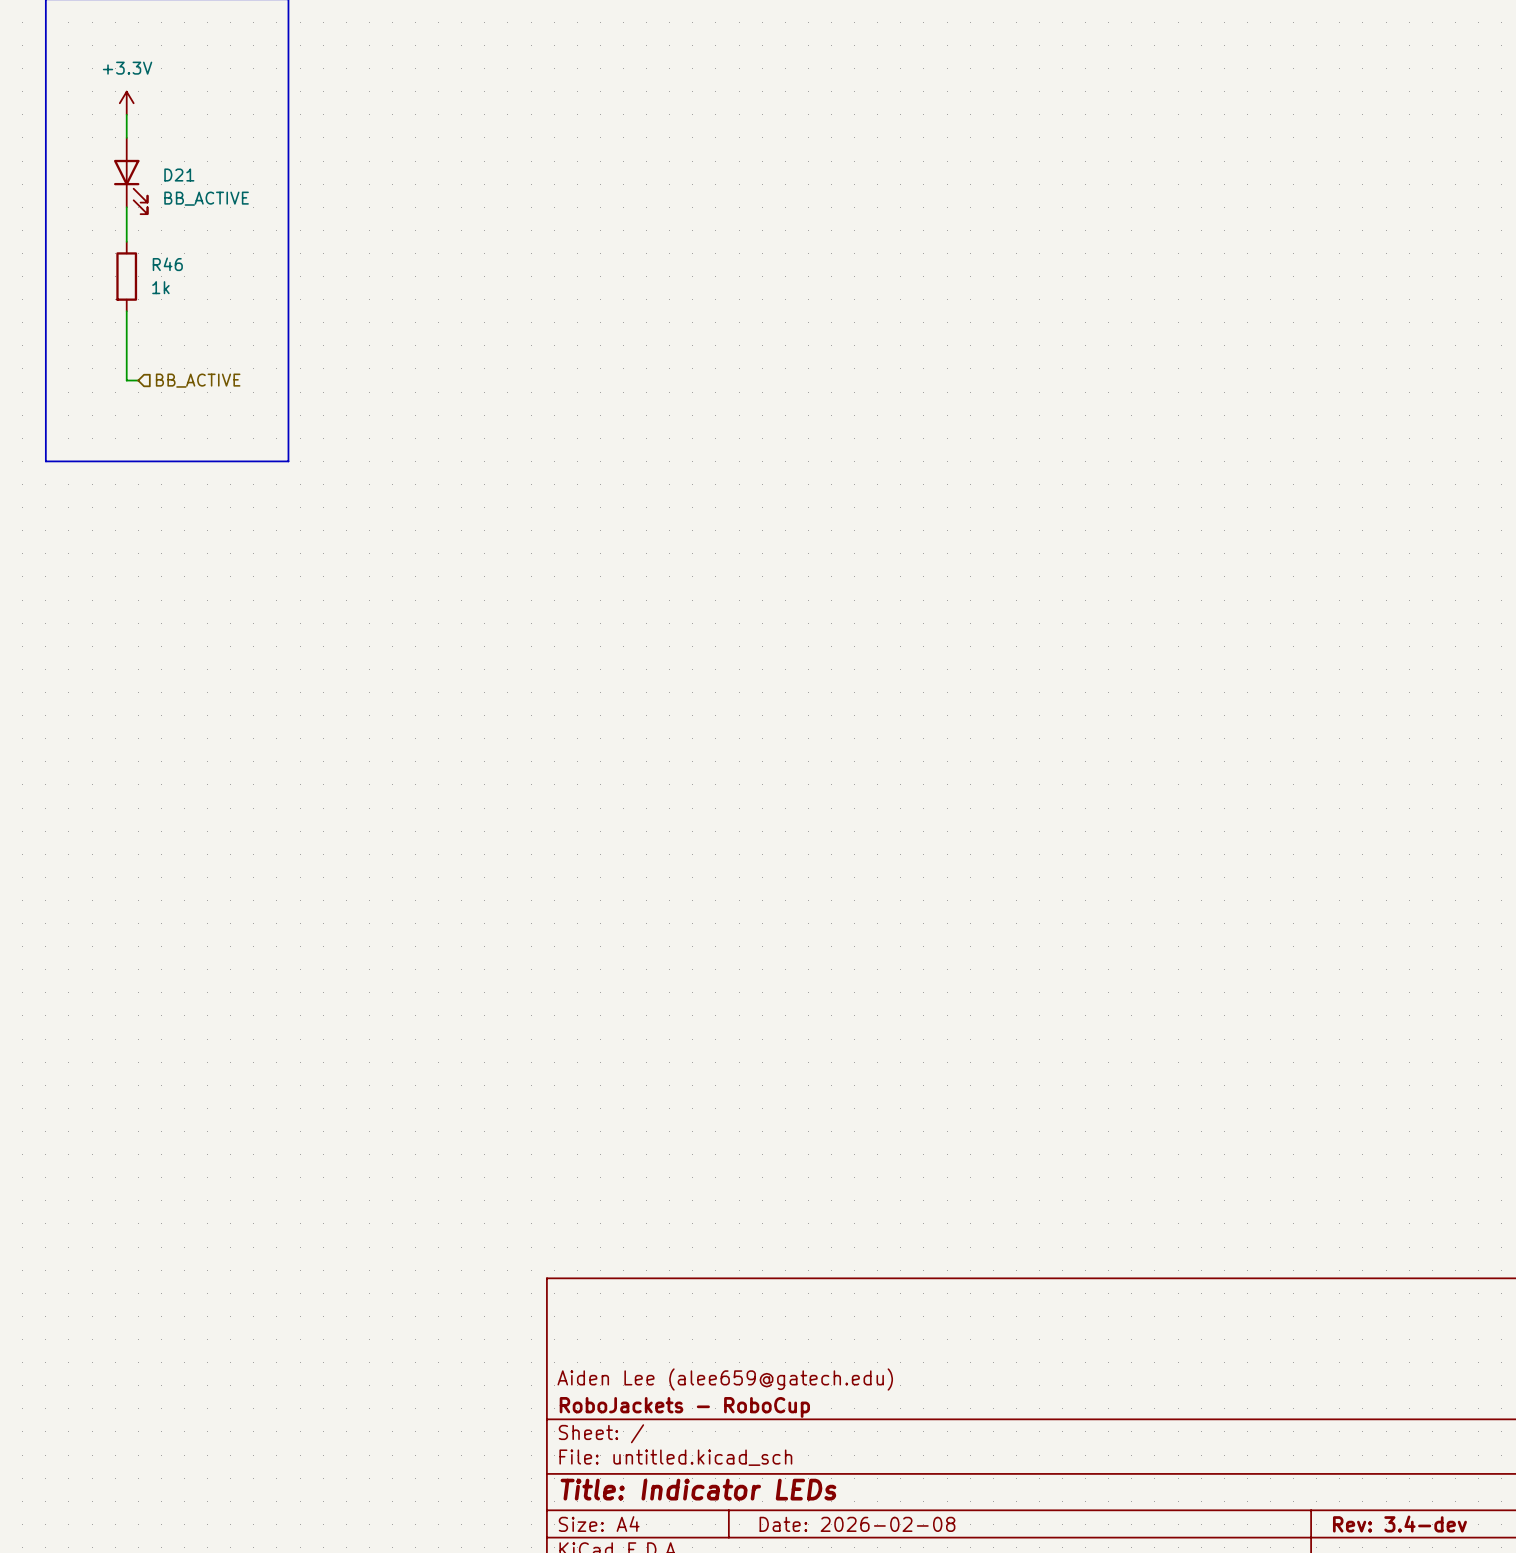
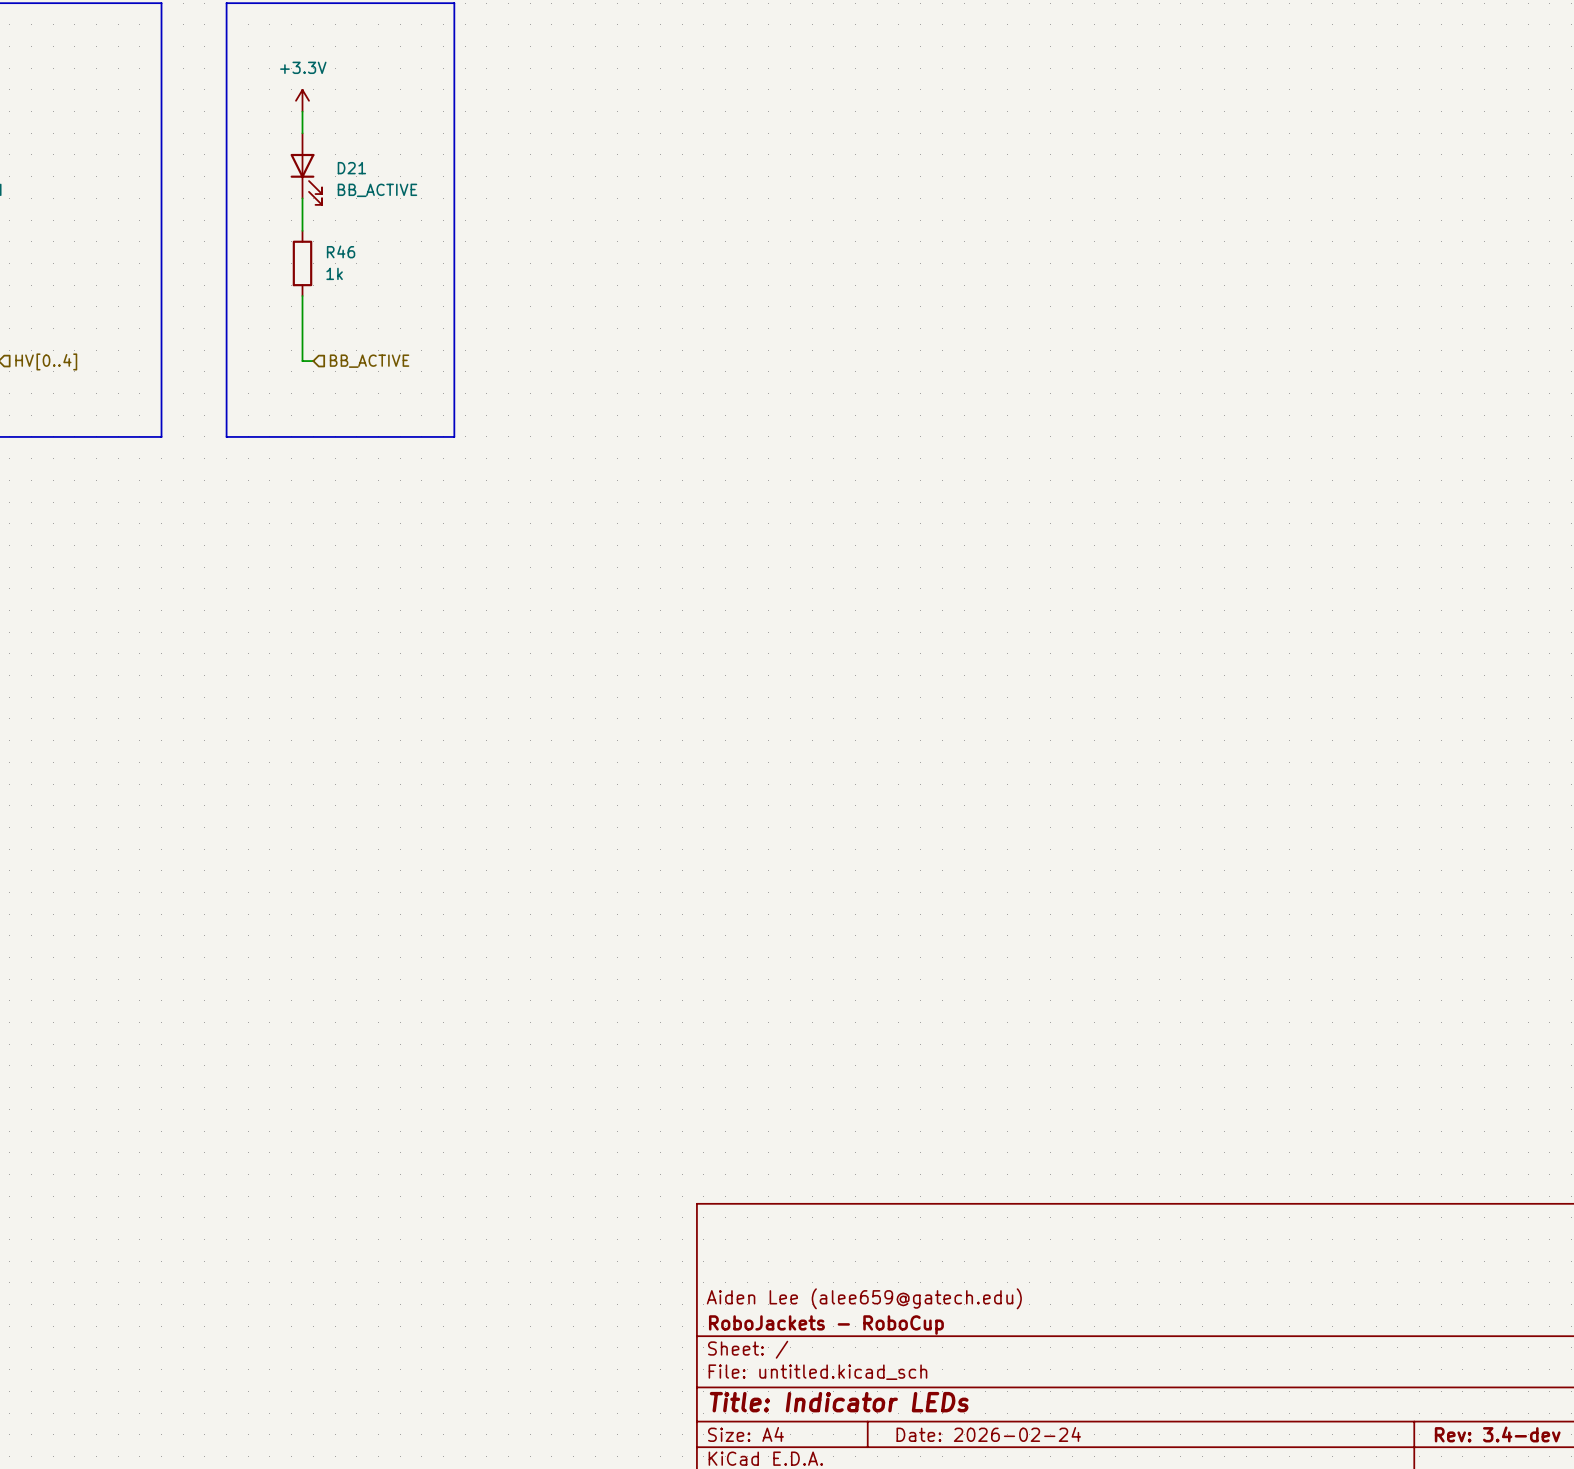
title block: Date: 2026-02-08 (857, 1524) -> Date: 2026-02-24 (988, 1434)

